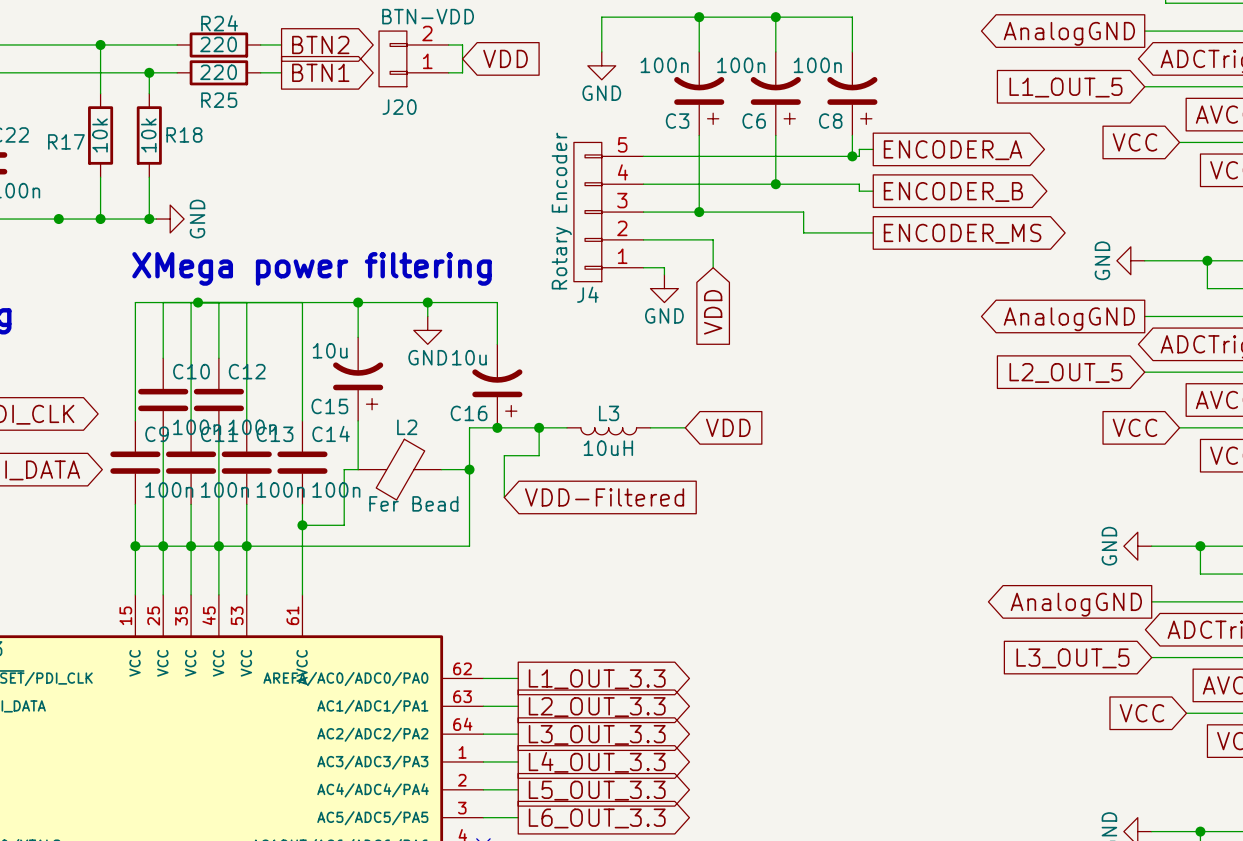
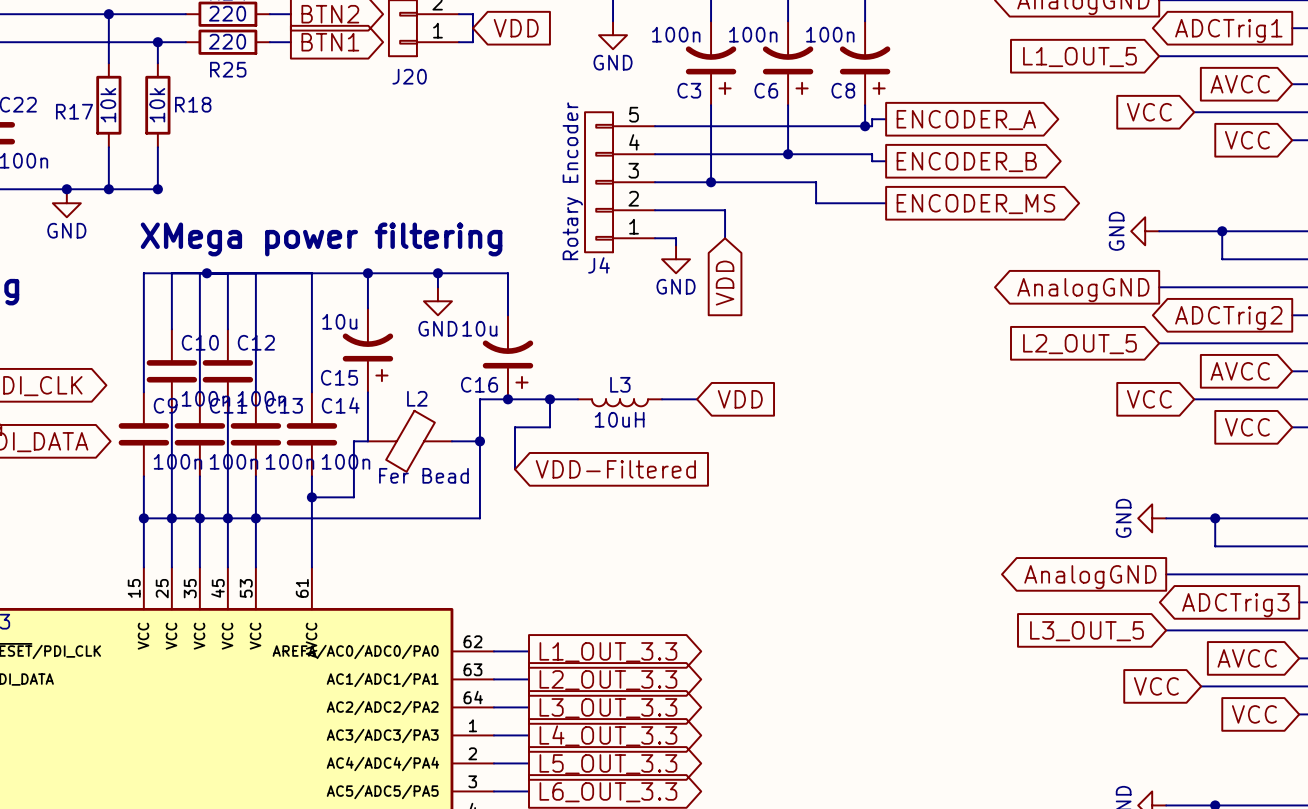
power symbol rotation: 0° (170, 219) -> 90° clockwise (66, 203)
power symbol position: GND (170, 219) -> GND (66, 203)

